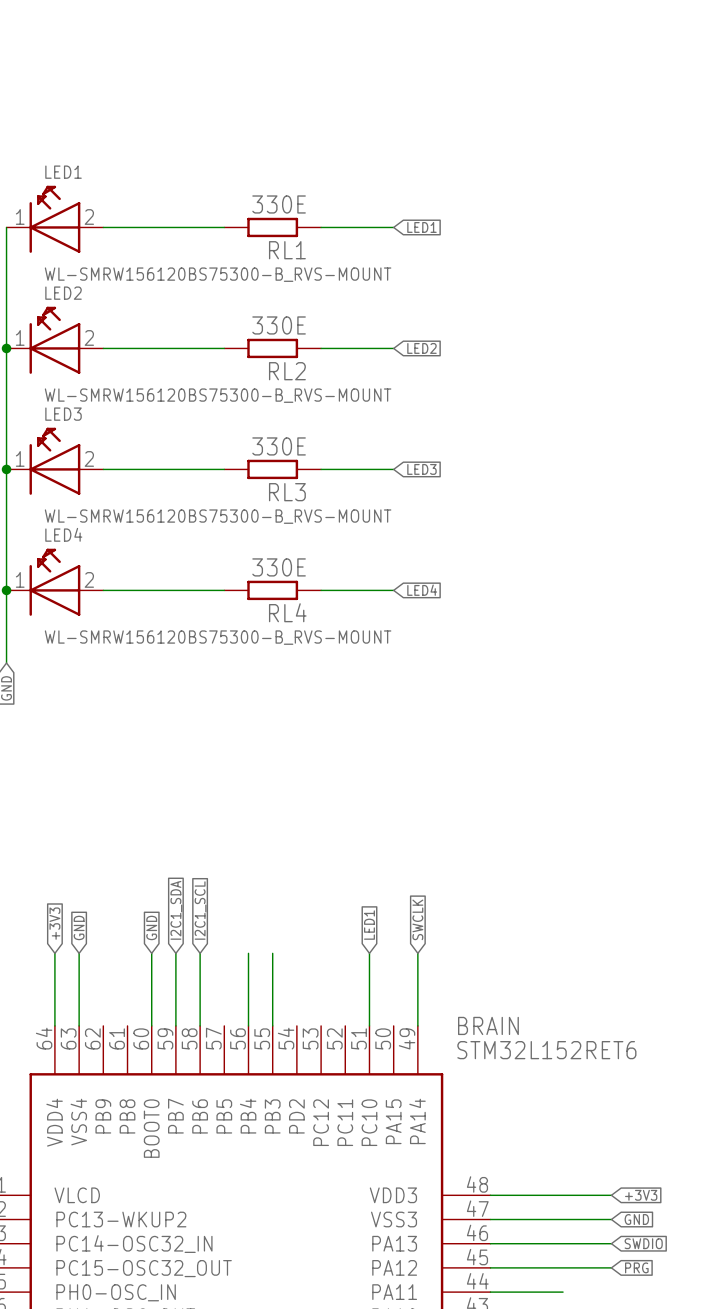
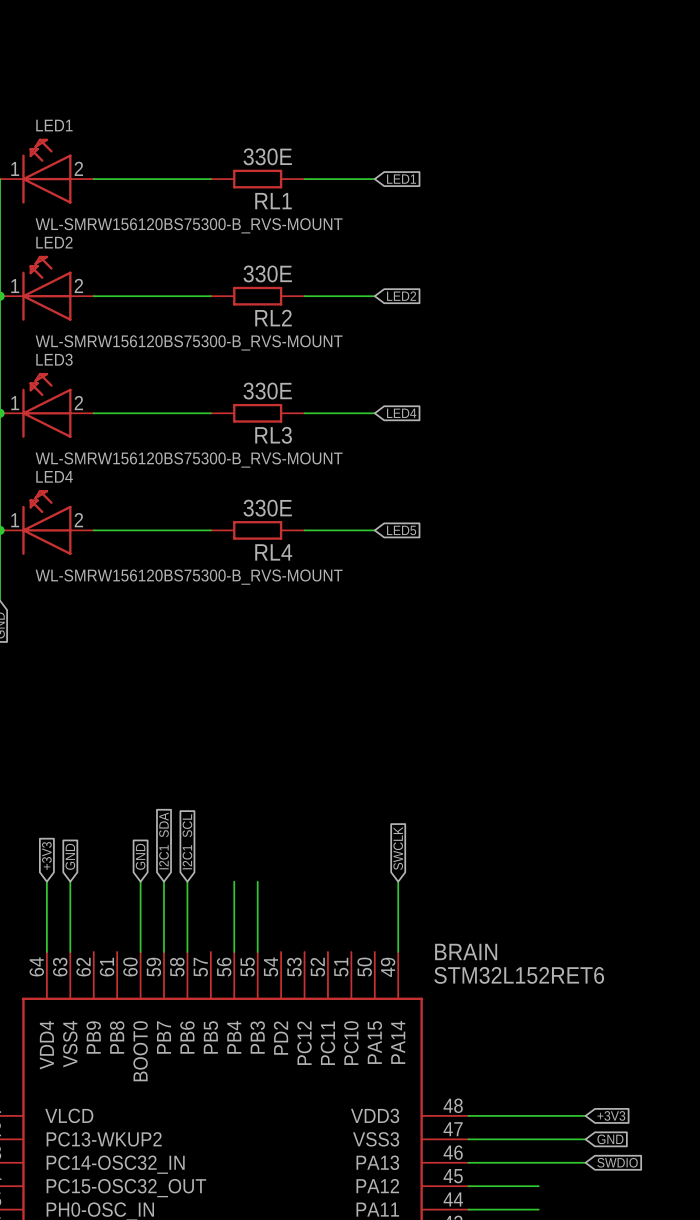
global label: LED3 (421, 469) -> LED4 (401, 413)
global label: LED4 (422, 590) -> LED5 (401, 530)
global label: LED1 (369, 925) -> none
wire: (369, 953) (369, 1025) -> none
wire: (563, 1267) (611, 1267) -> none
global label: PRG (636, 1267) -> none

